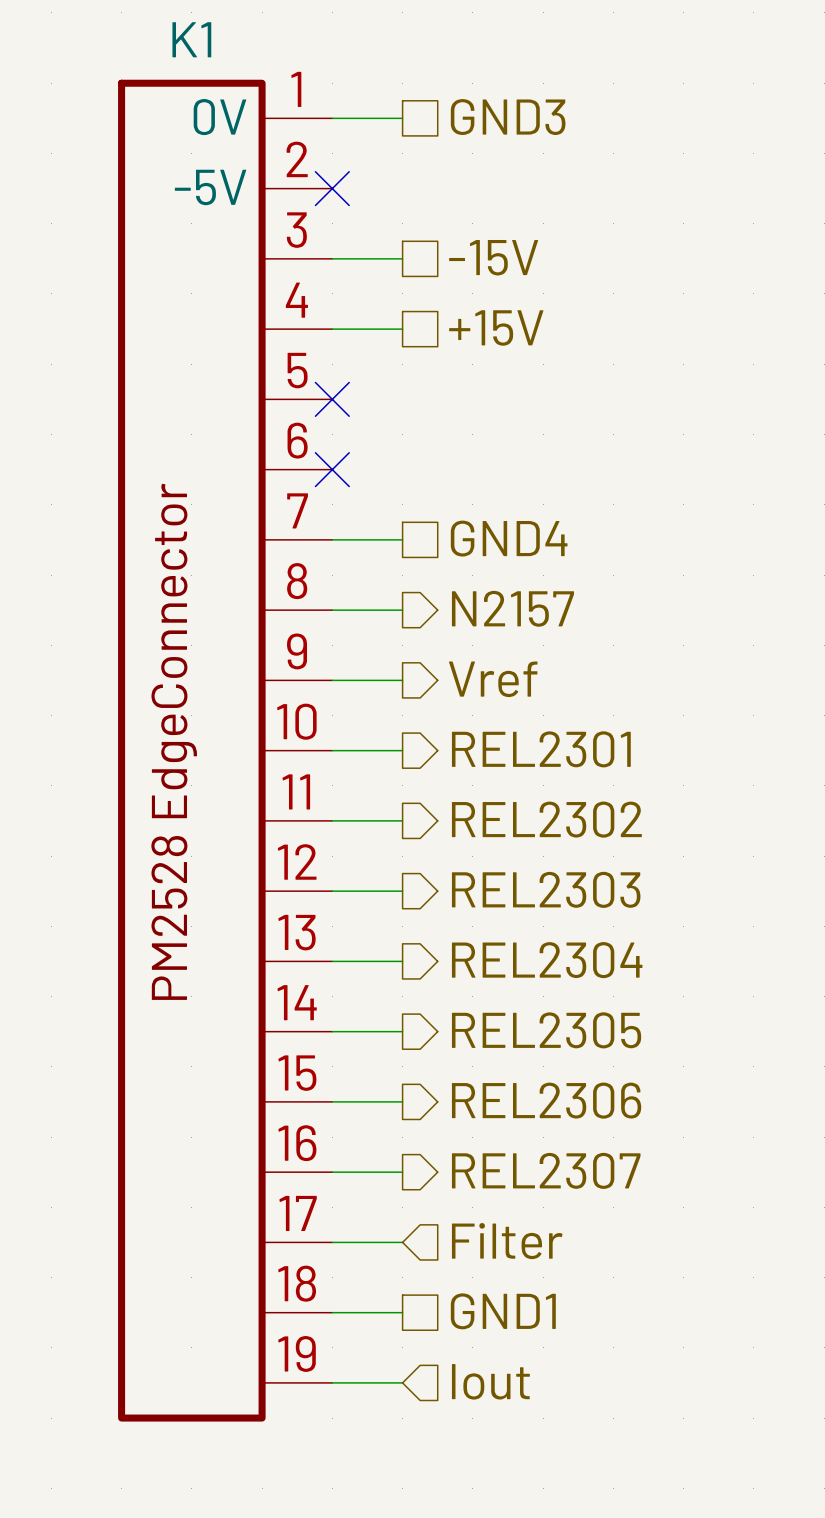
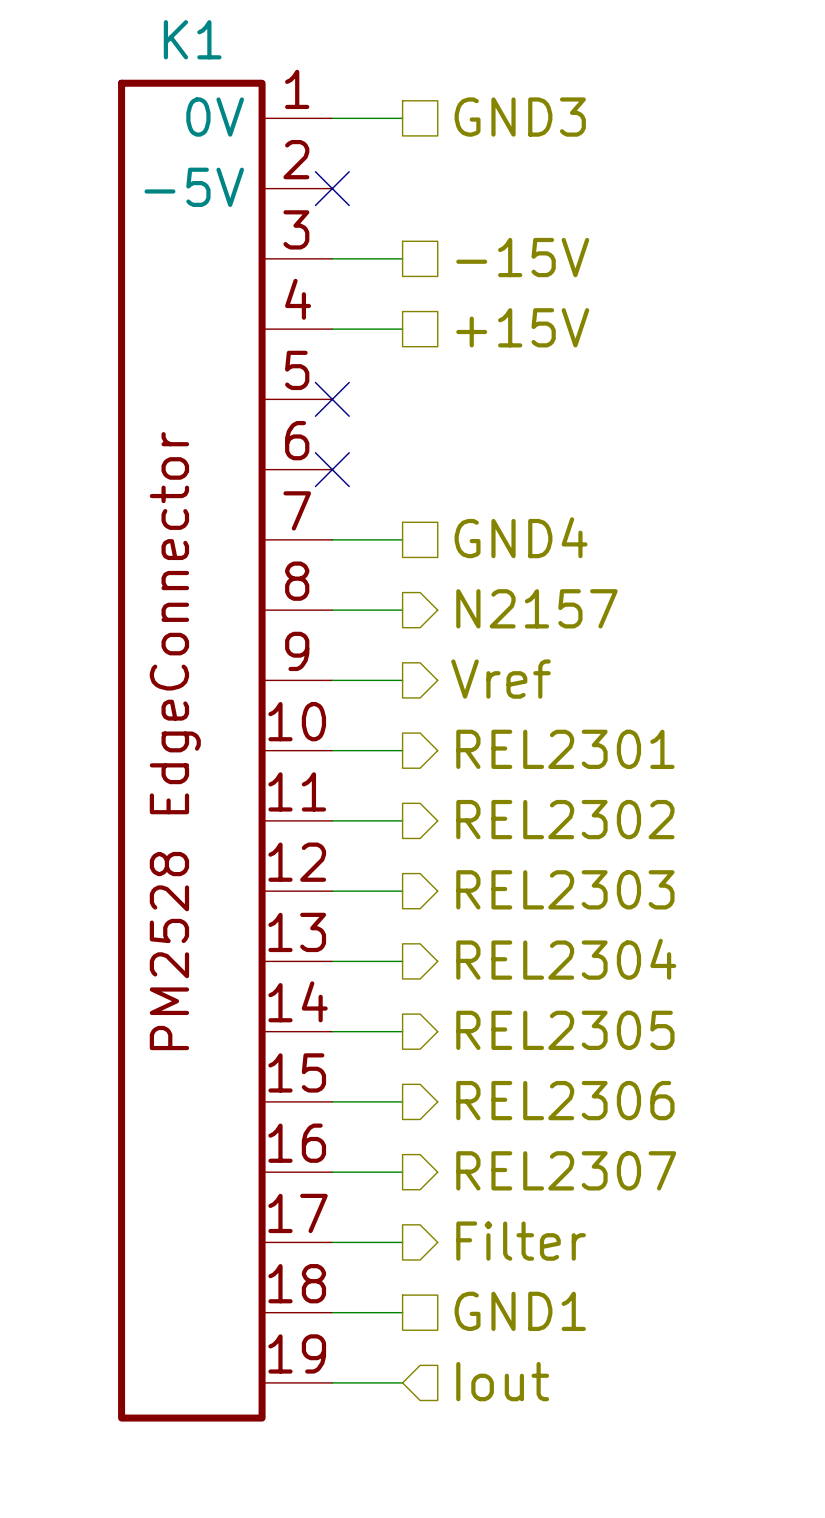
hierarchical label shape: input (507, 1241) -> output (521, 1241)

